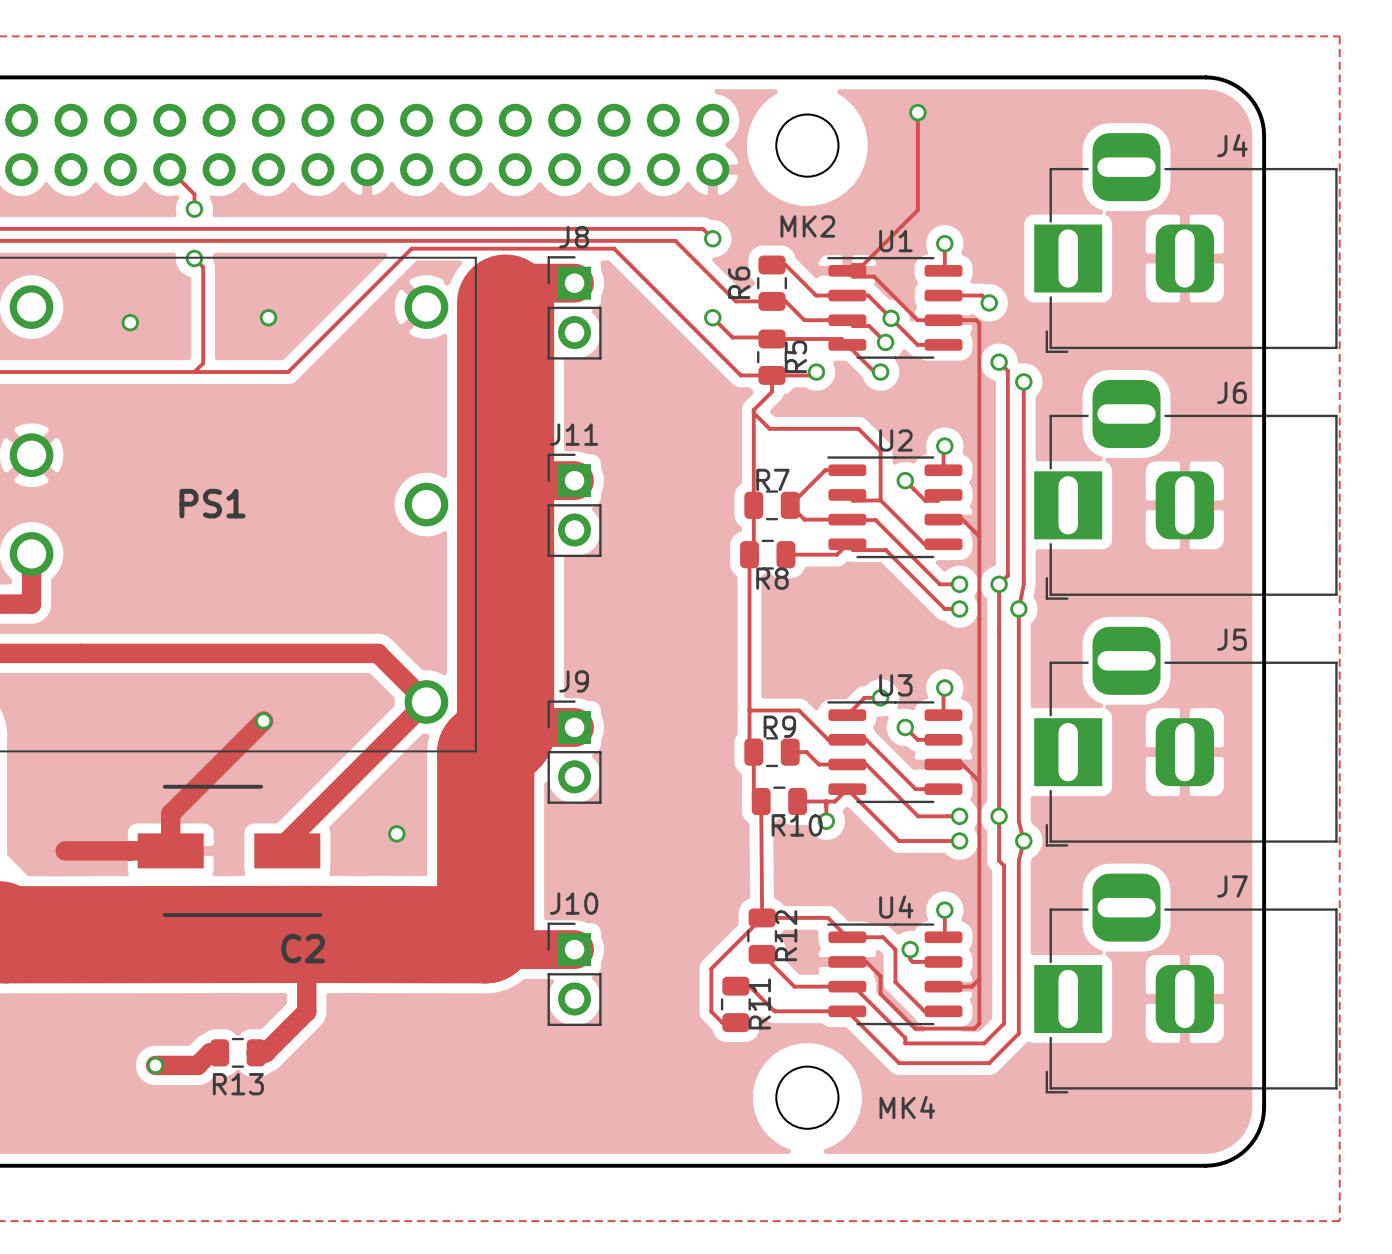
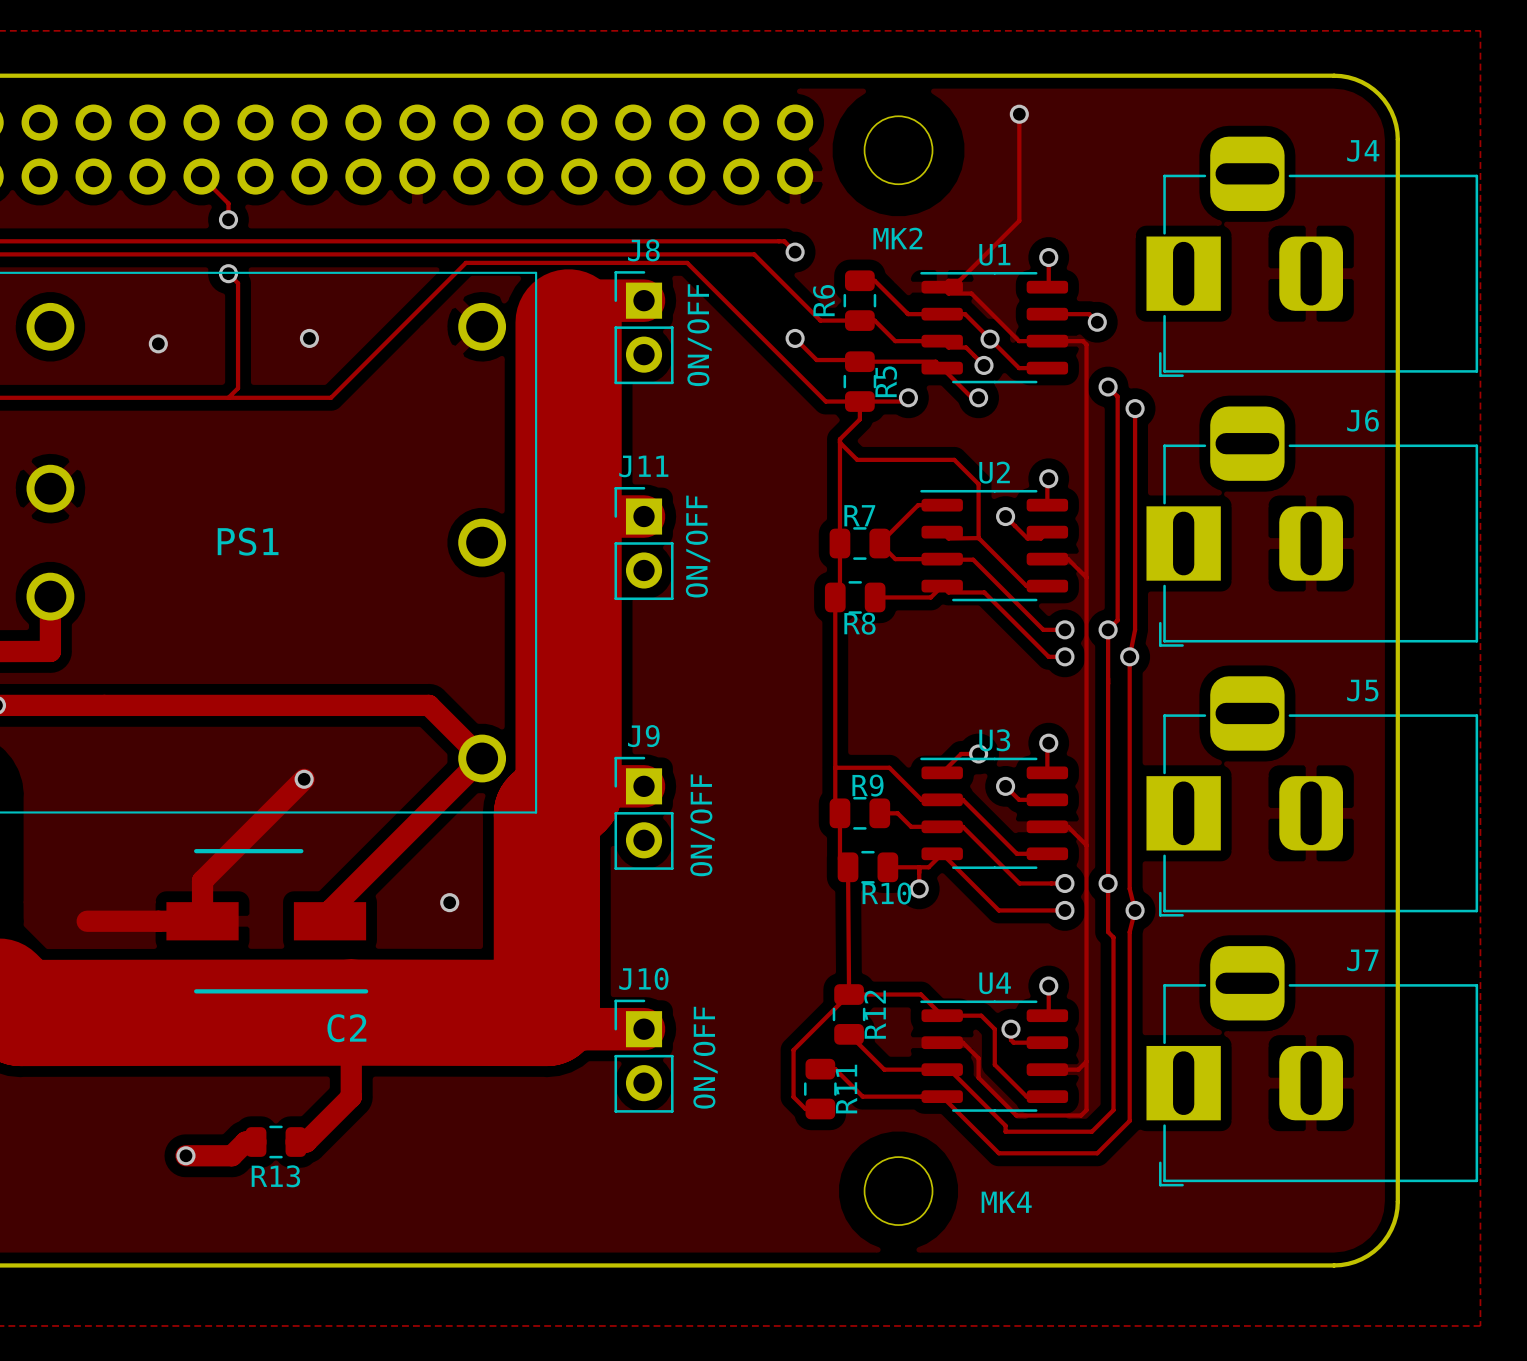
text: none -> ON/OFF (699, 335)
text: none -> ON/OFF (698, 546)
text: none -> ON/OFF (702, 825)
text: none -> ON/OFF (705, 1057)

